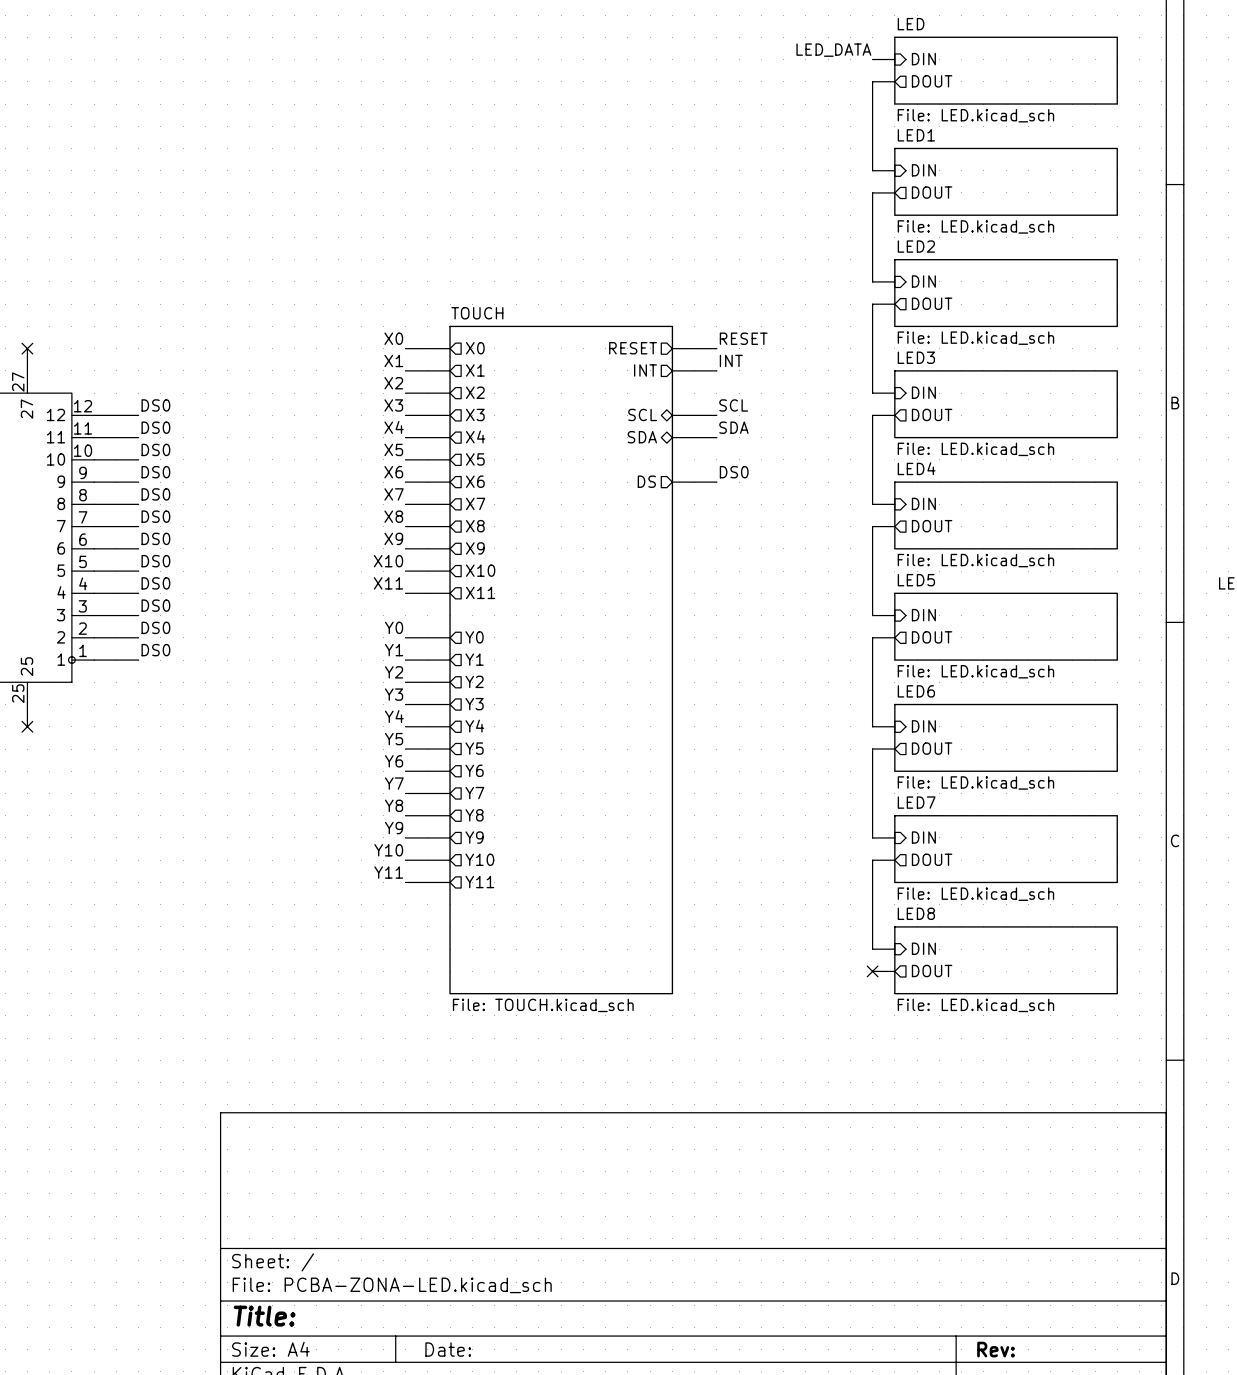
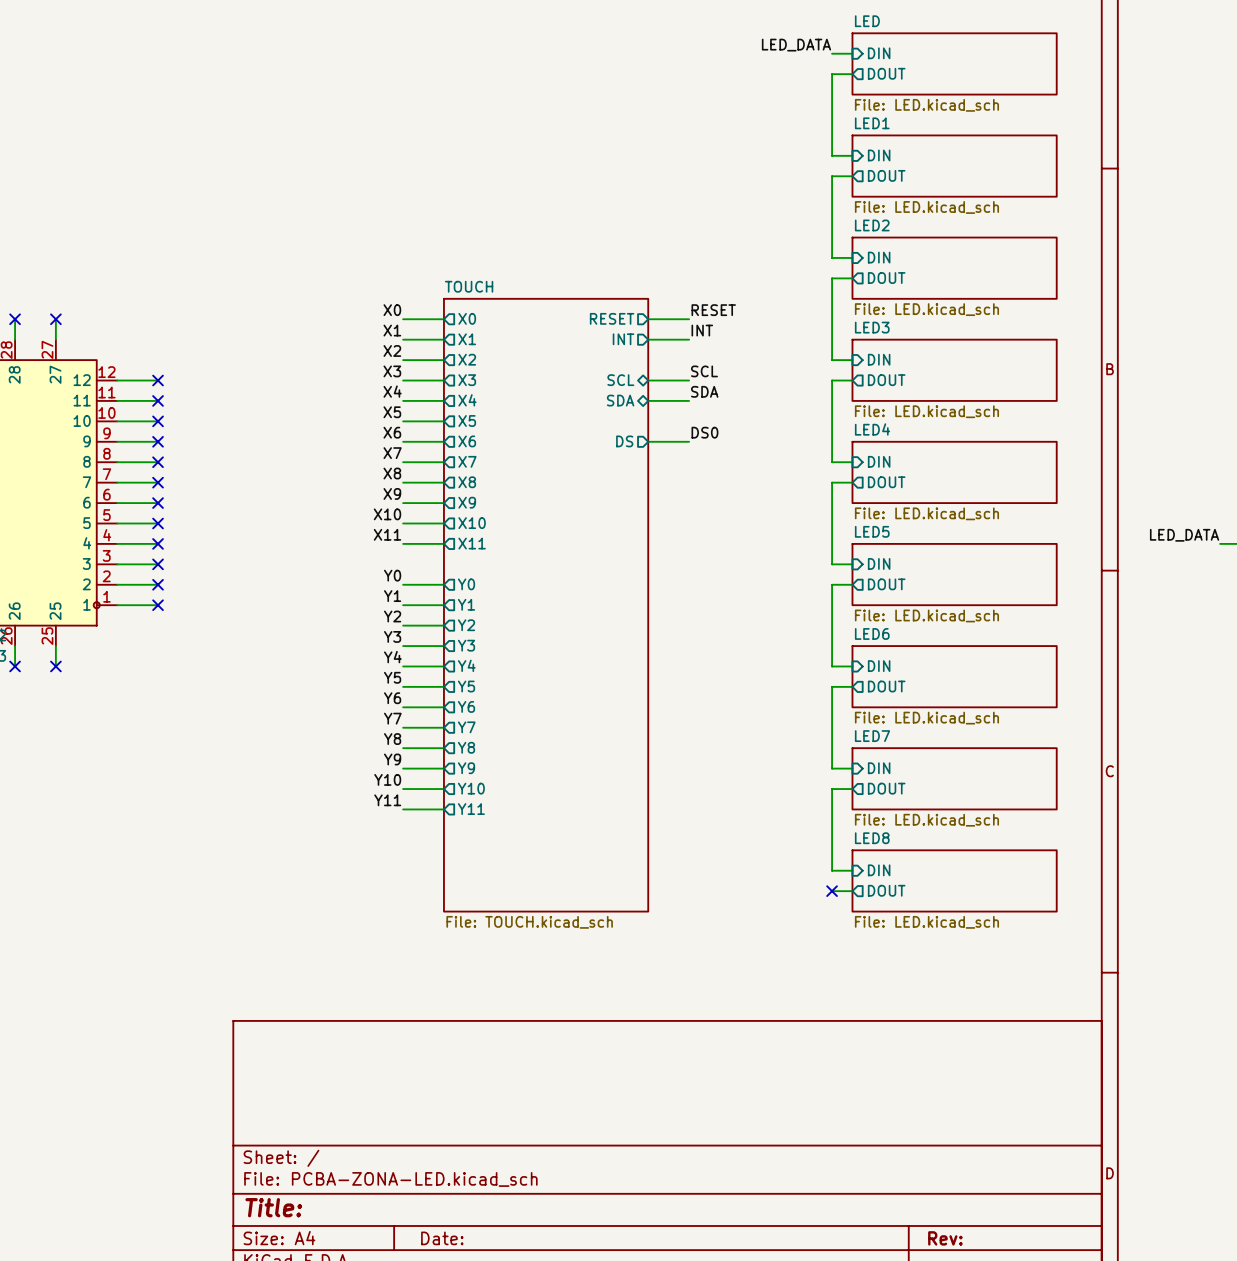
label: DS0 (155, 405) -> none
no-connect mark: none -> (158, 380)
label: DS0 (155, 427) -> none
no-connect mark: none -> (158, 400)
label: DS0 (155, 449) -> none
no-connect mark: none -> (158, 421)
label: DS0 (155, 472) -> none
no-connect mark: none -> (158, 441)
label: DS0 (155, 494) -> none
no-connect mark: none -> (158, 462)
label: DS0 (155, 516) -> none
no-connect mark: none -> (158, 482)
label: DS0 (155, 538) -> none
no-connect mark: none -> (158, 503)
label: DS0 (155, 561) -> none
no-connect mark: none -> (158, 523)
label: DS0 (155, 583) -> none
no-connect mark: none -> (158, 543)
label: DS0 (155, 605) -> none
no-connect mark: none -> (158, 564)
label: DS0 (155, 627) -> none
no-connect mark: none -> (158, 584)
label: DS0 (155, 650) -> none
no-connect mark: none -> (158, 605)

